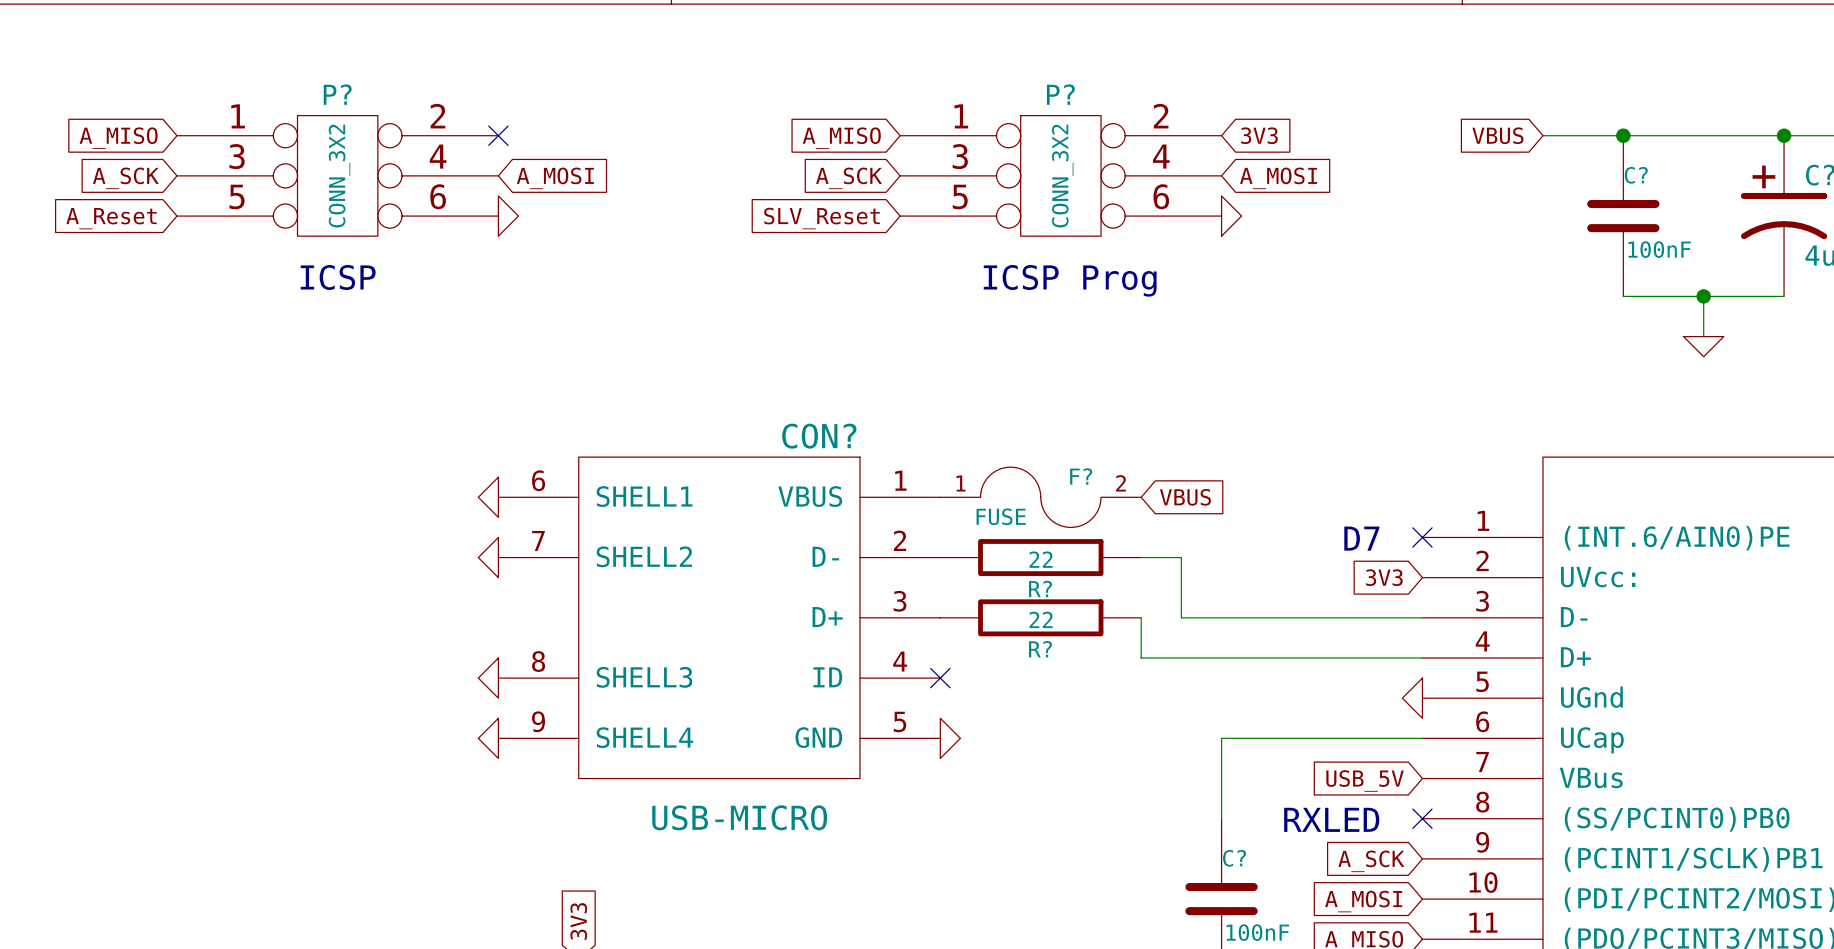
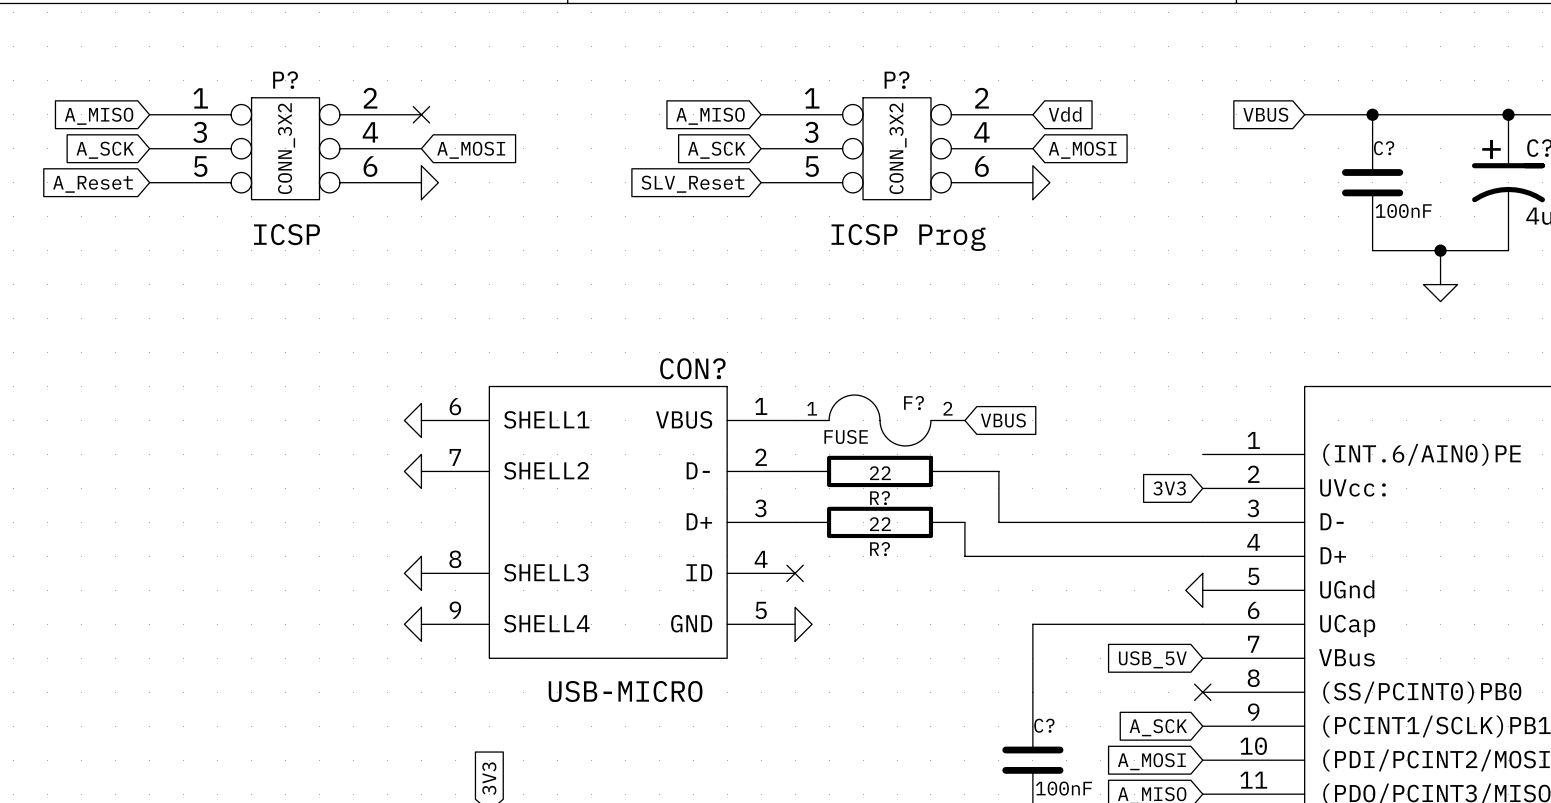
global label: 3V3 (1259, 135) -> Vdd (1065, 114)
no-connect mark: (1422, 537) -> none
text: D7 (1361, 538) -> none
text: RXLED (1331, 819) -> none

